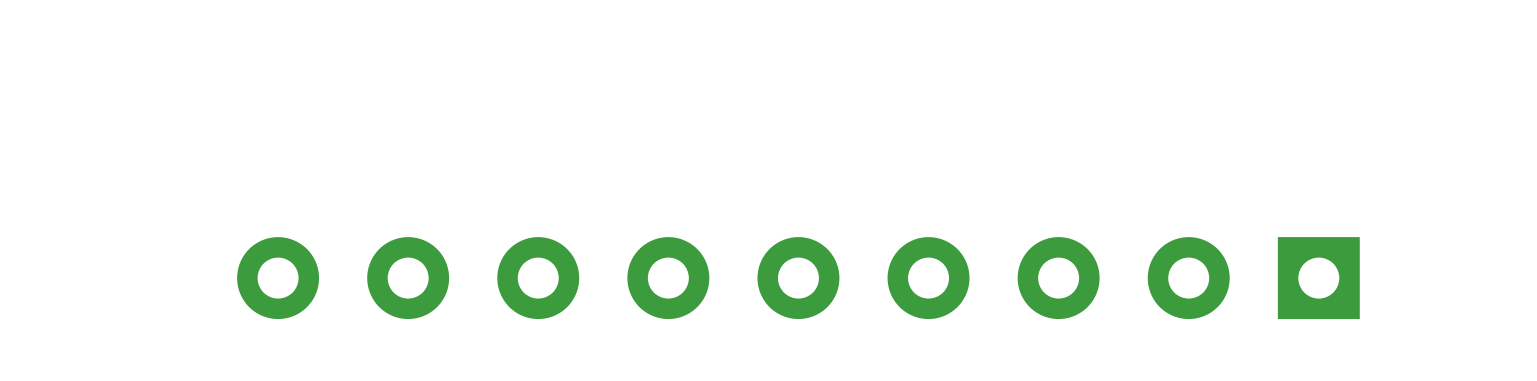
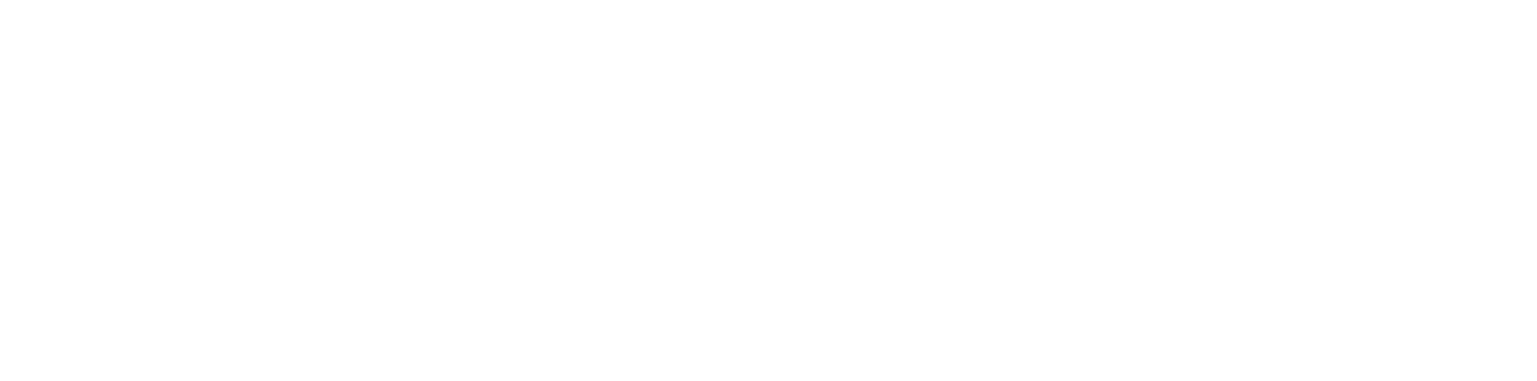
part: (798, 278) -> none

